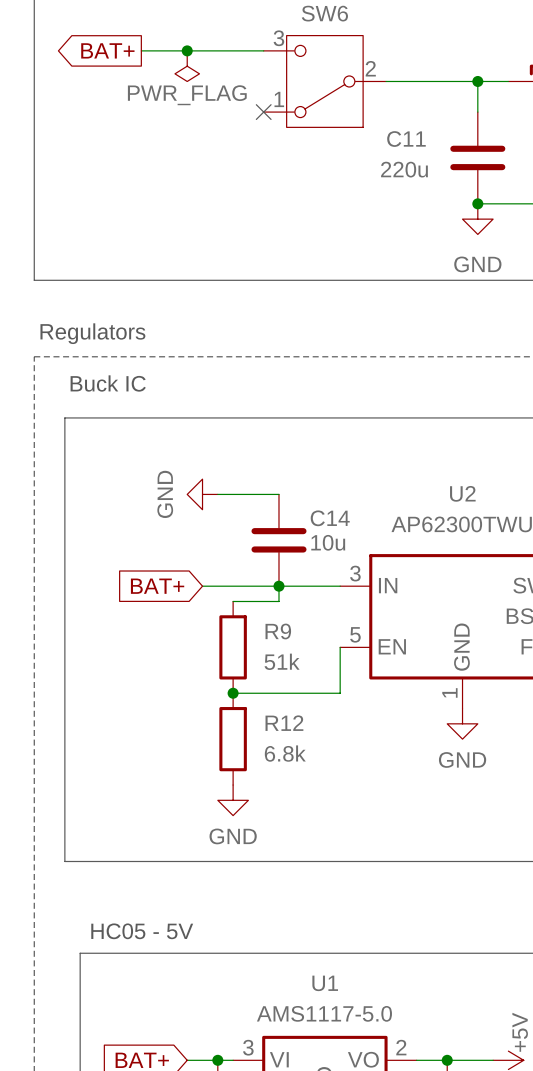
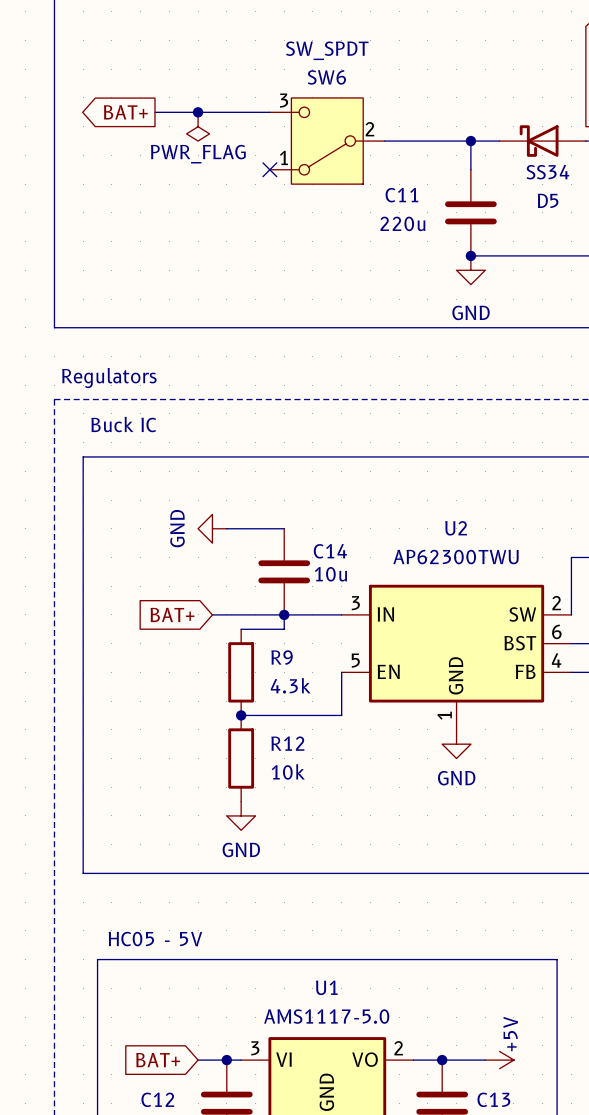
R9 value: 51k (282, 661) -> 4.3k (290, 685)
R12 value: 6.8k (285, 753) -> 10k (288, 771)

